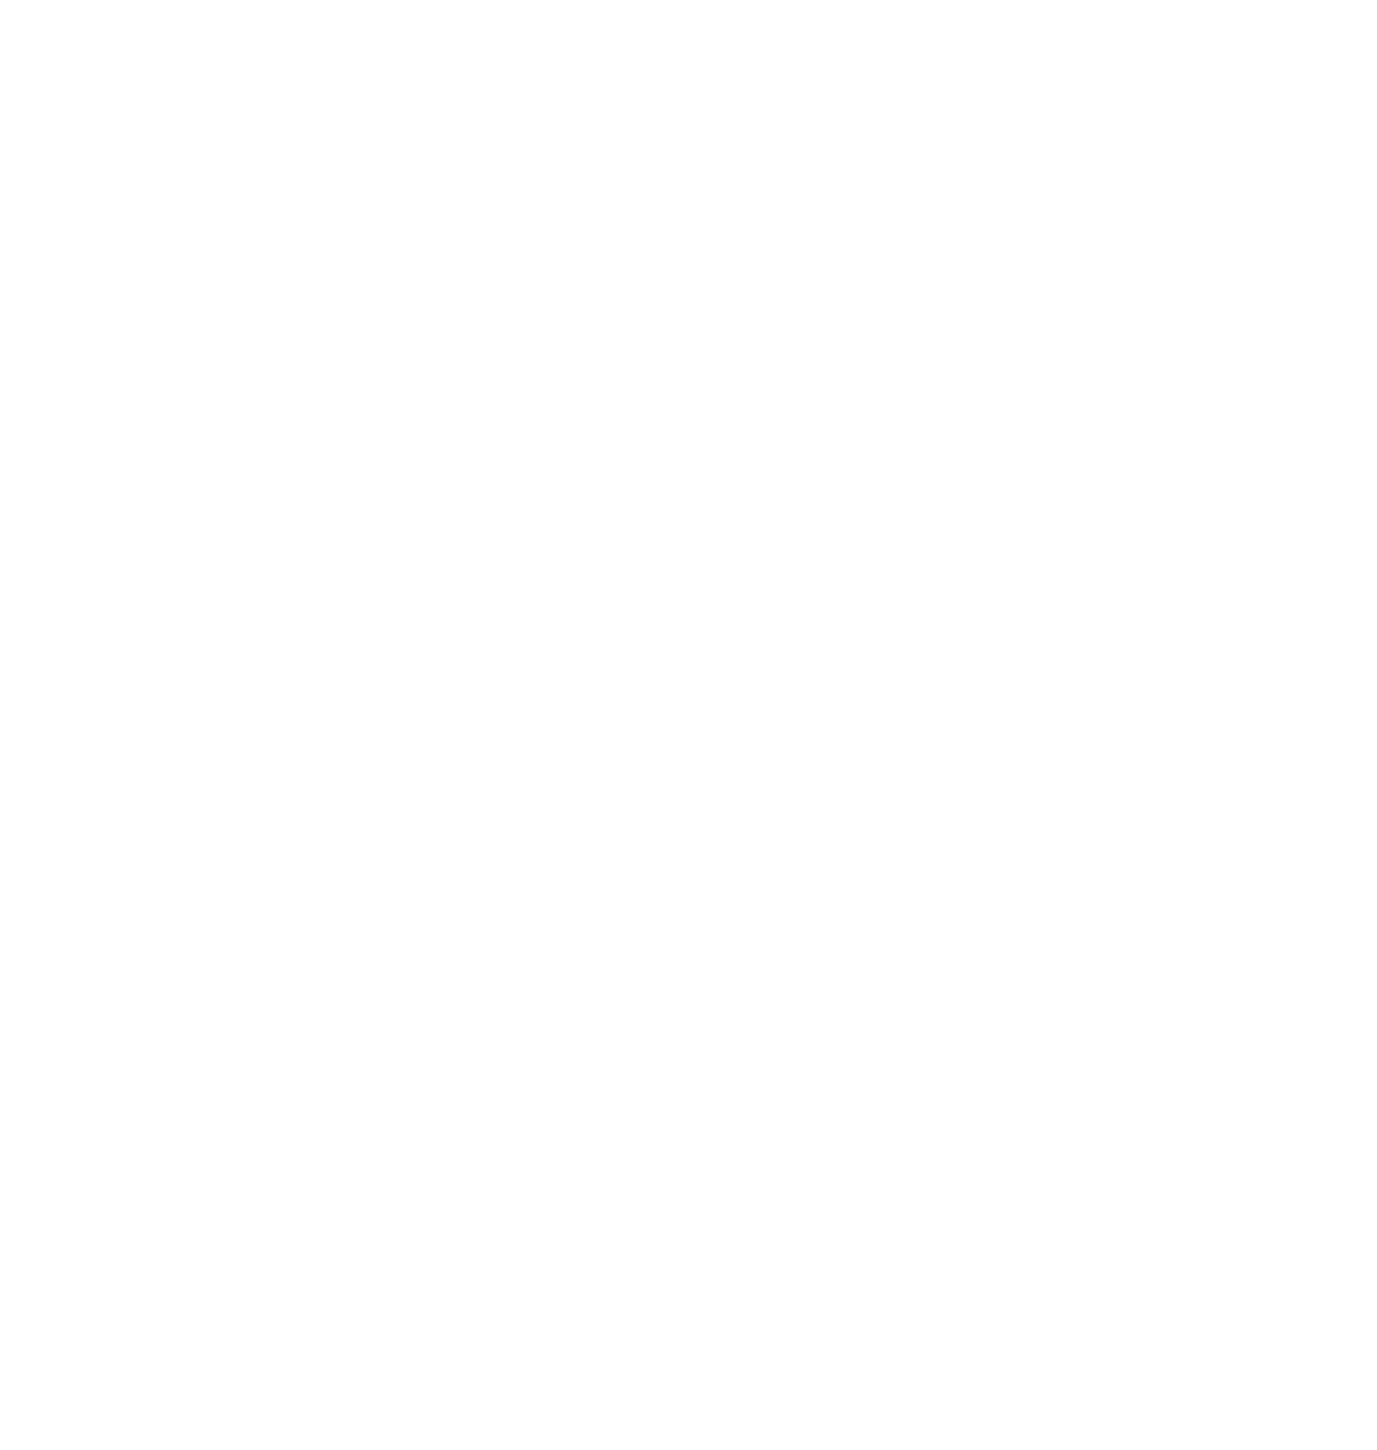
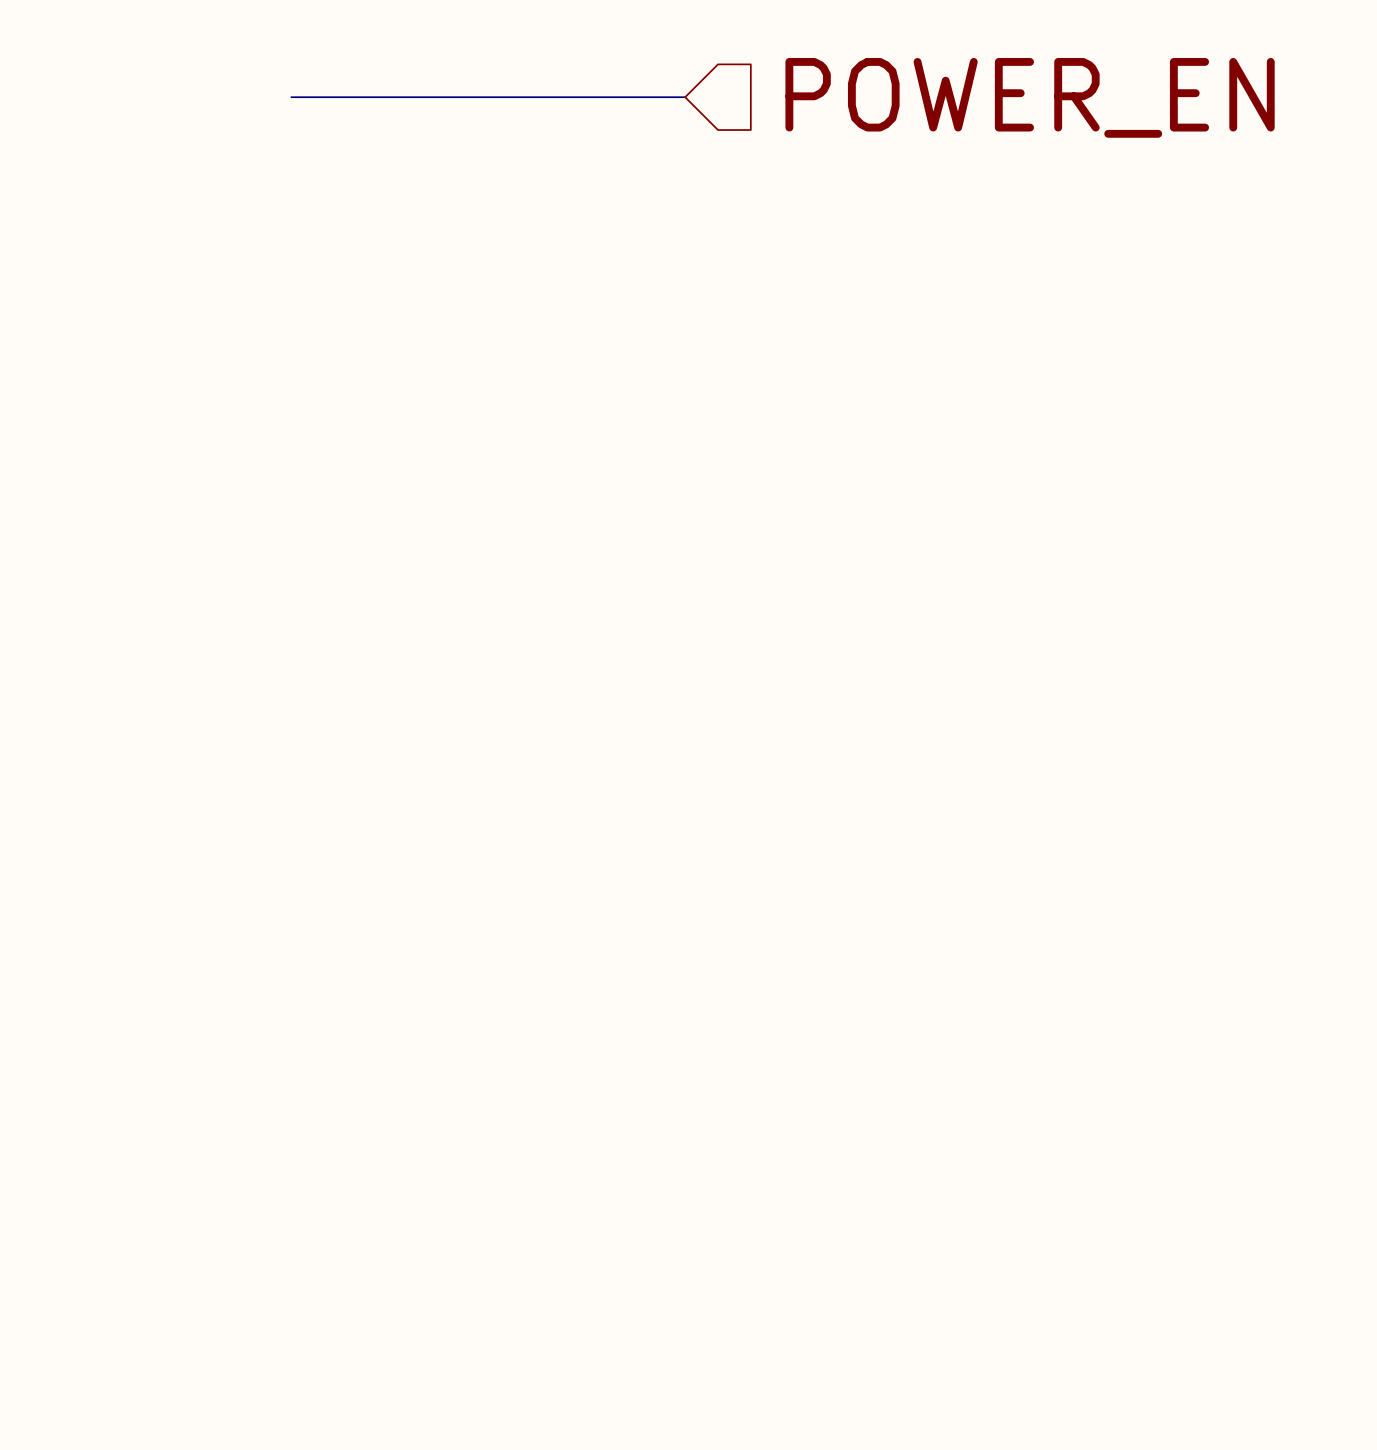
wire: none -> (291, 97) (685, 97)
hierarchical label: none -> POWER_EN (1030, 97)

